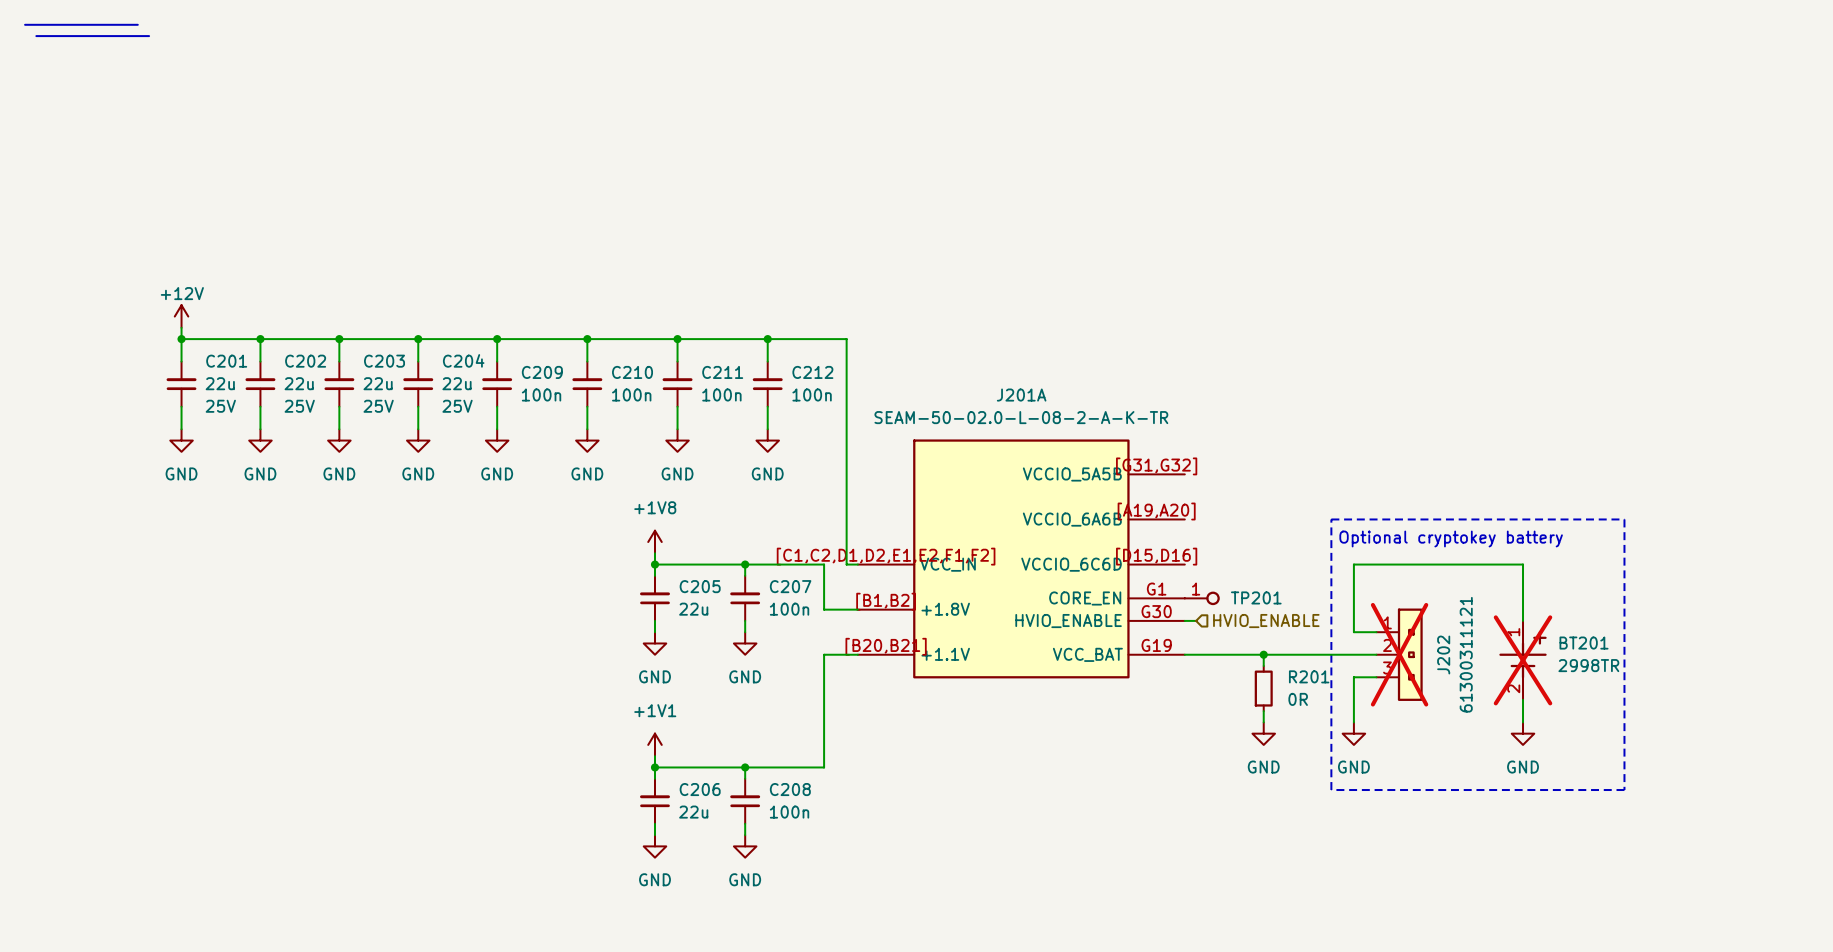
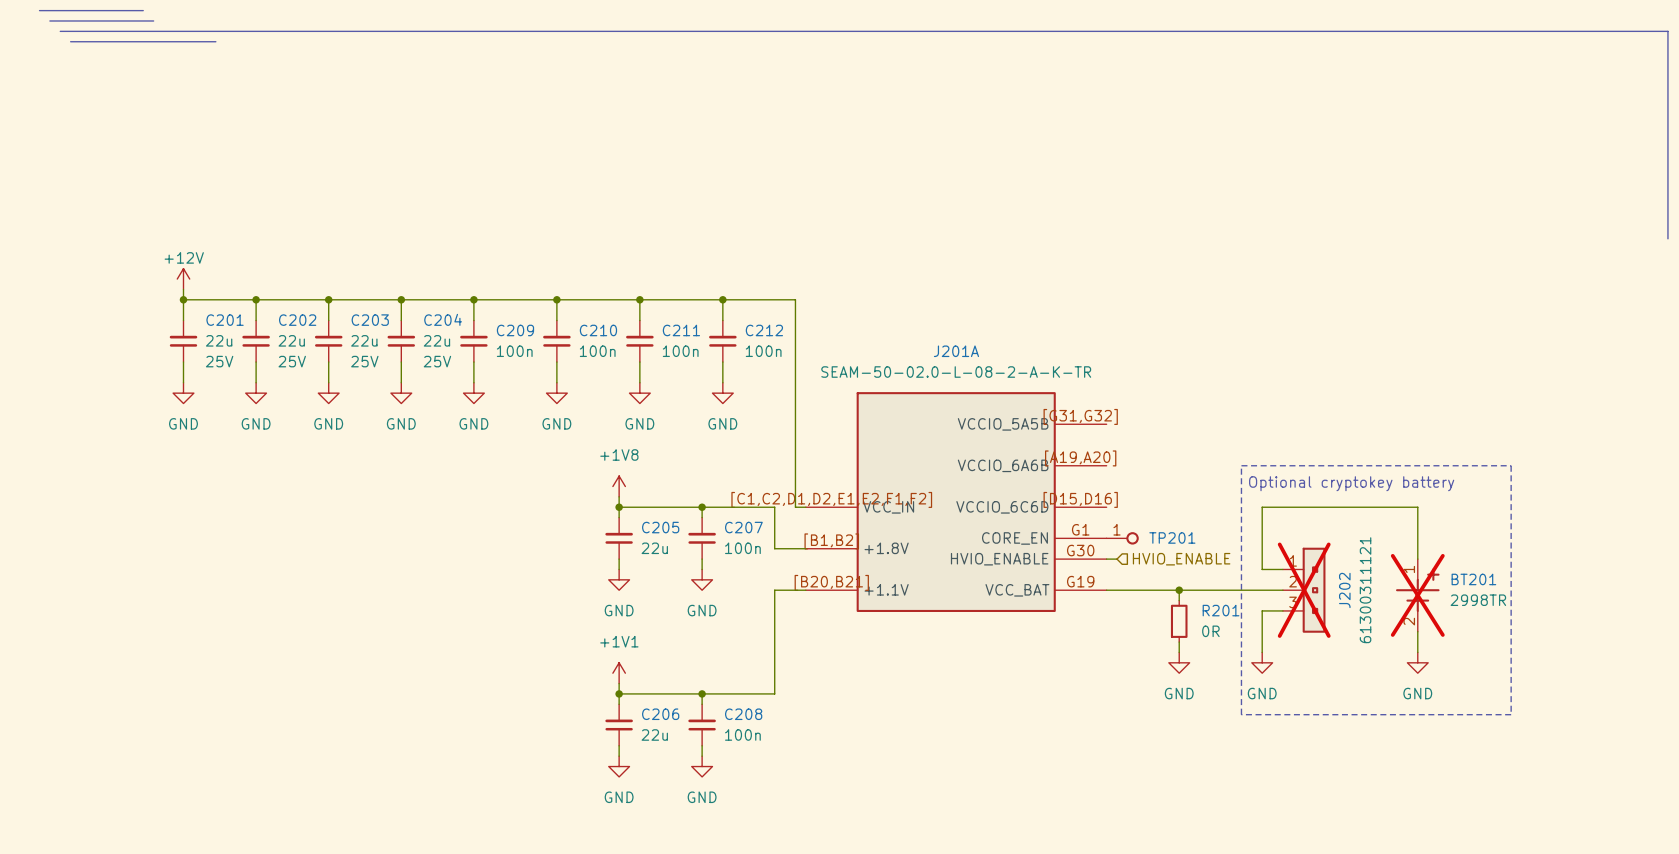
bus: none -> (60, 31) (1667, 31) (1667, 238)
bus: none -> (70, 41) (215, 41)

